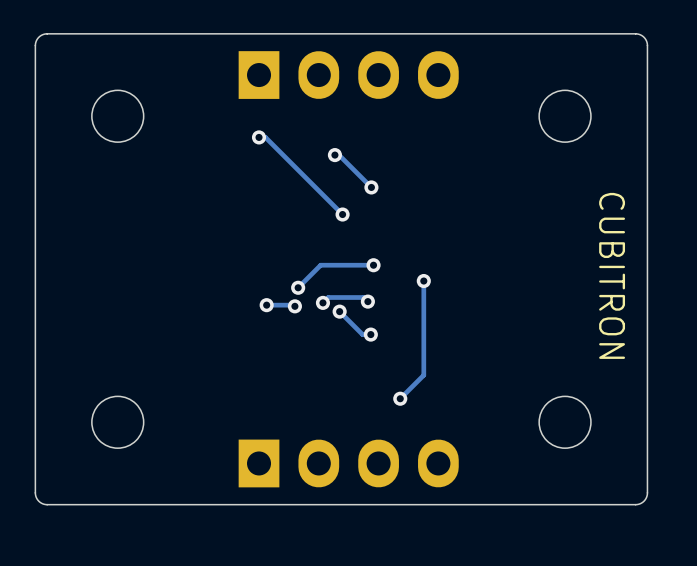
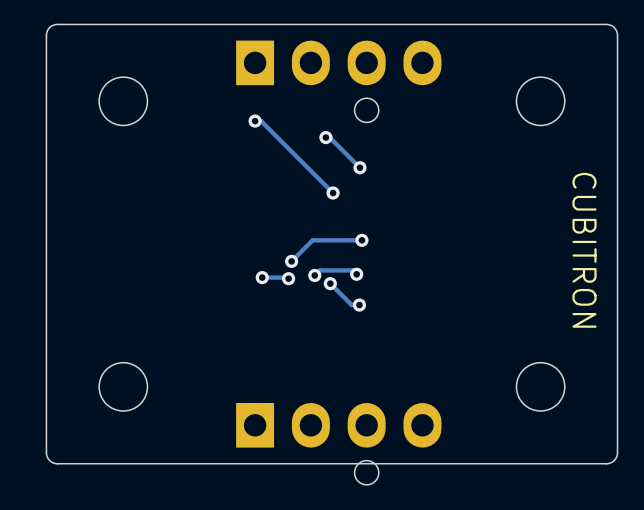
part footprint: [238, 51, 459, 99] -> [236, 40, 442, 123]
track: (423, 281) (423, 375) (400, 398) -> none
via: (423, 281) -> none
via: (400, 398) -> none
part footprint: [238, 439, 459, 488] -> [236, 403, 442, 485]

